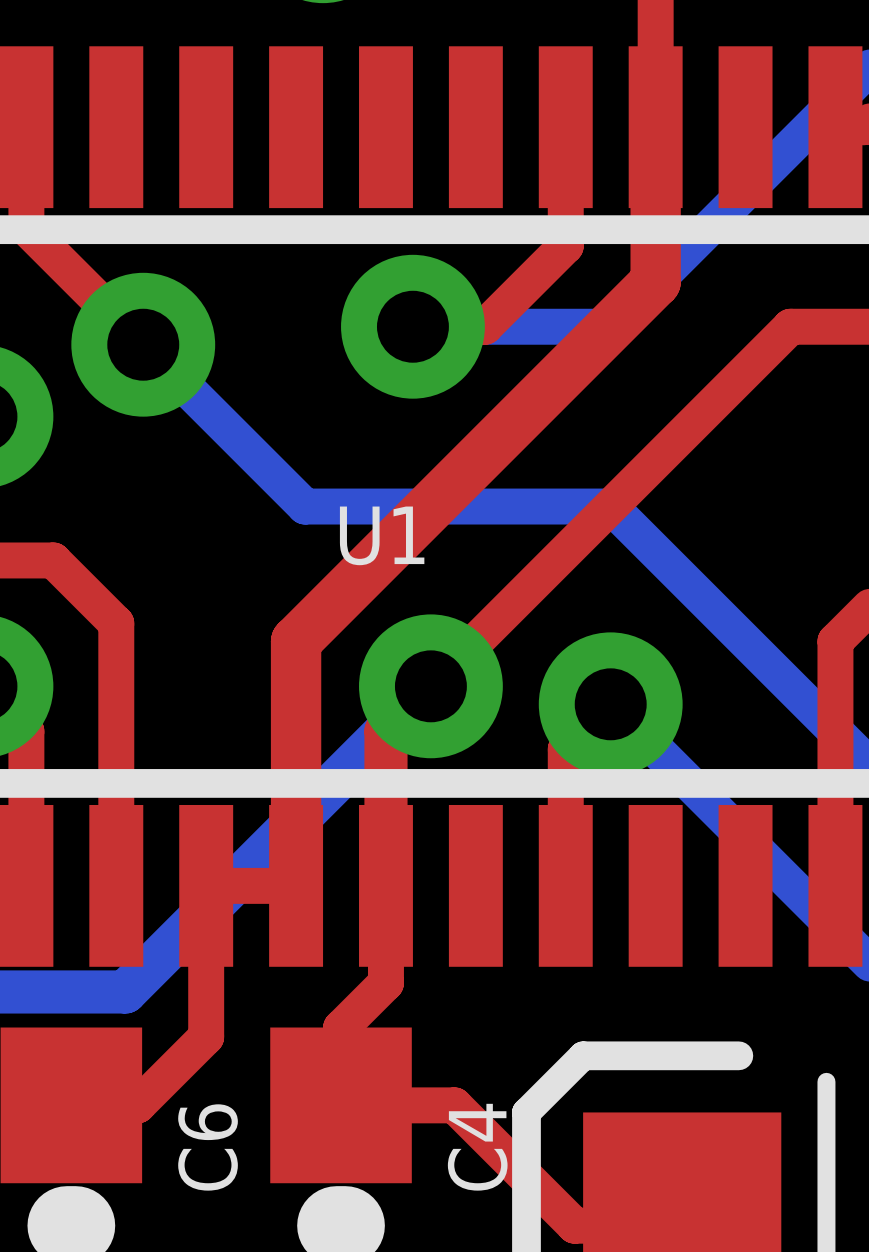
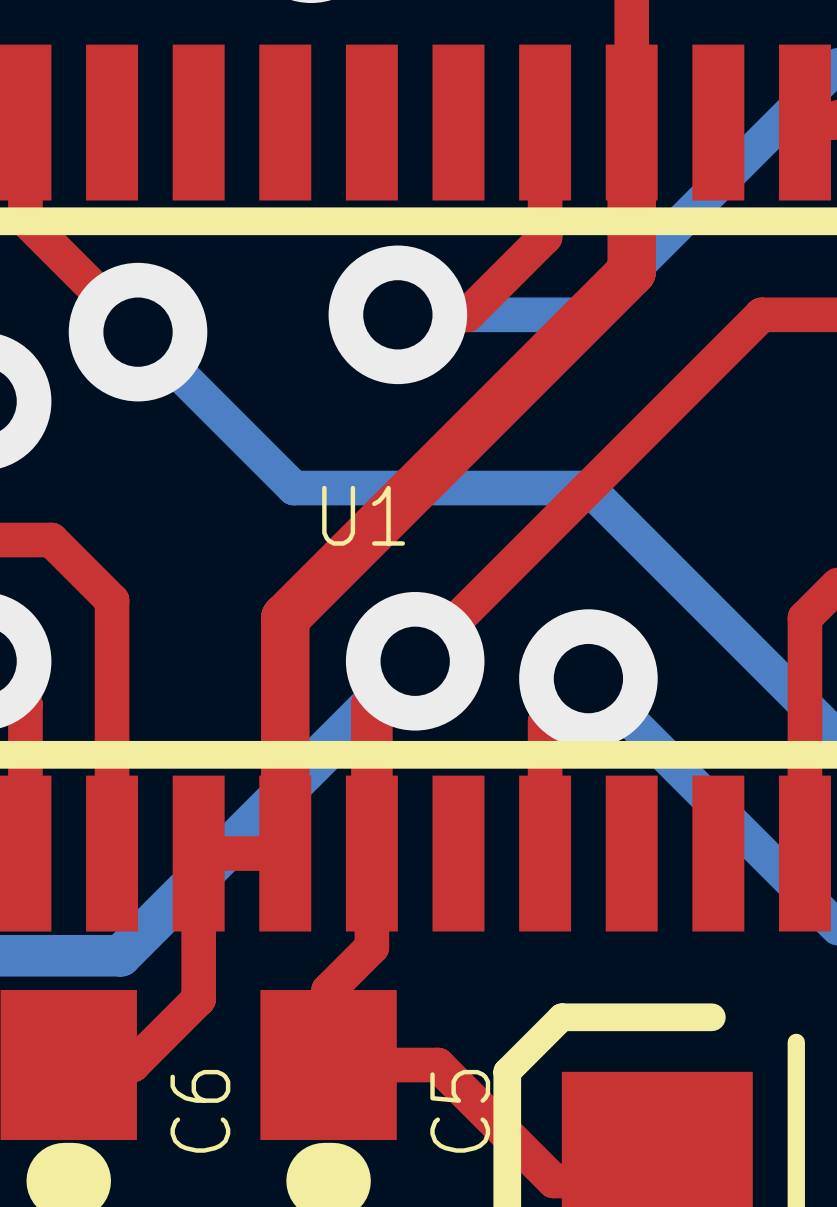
C4 name: C4 (477, 1147) -> C5 (460, 1111)

